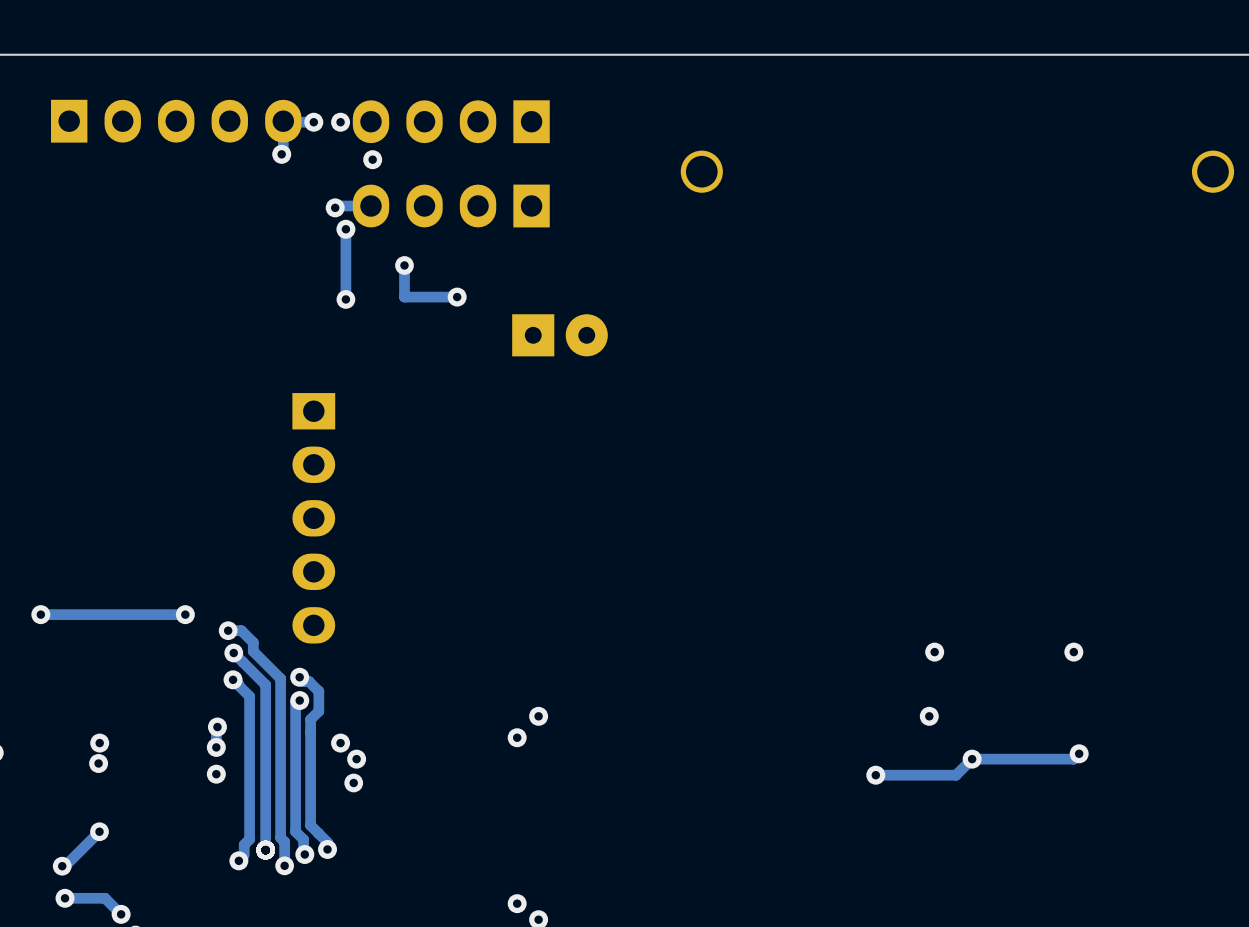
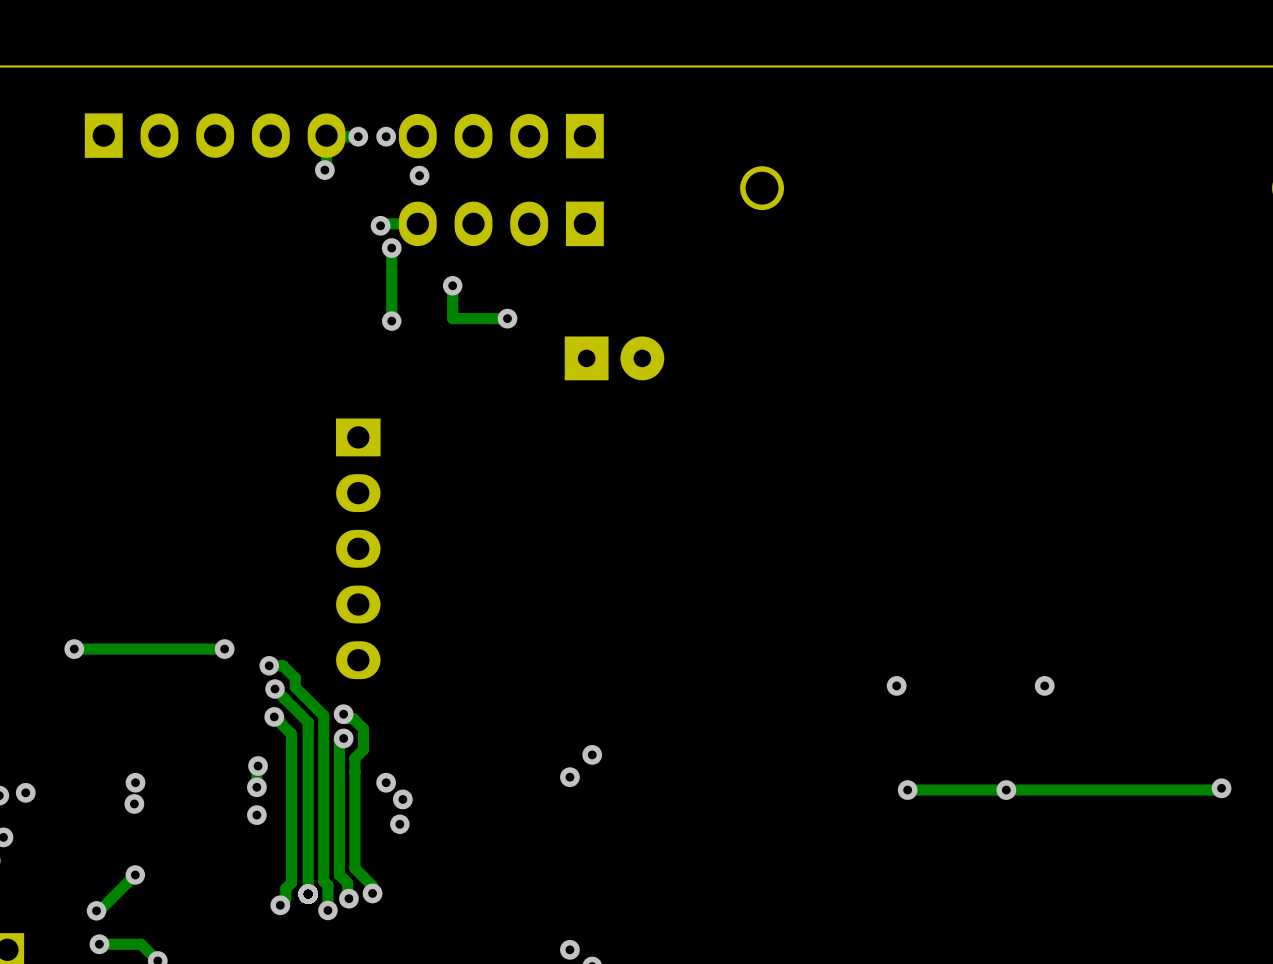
via: none -> (896, 685)
via position: (934, 652) -> (1044, 685)
via: (1073, 652) -> none
via: (929, 716) -> none
track: none -> (1221, 788) (1219, 790) (907, 790)
via: none -> (1221, 788)
via: none -> (907, 790)
via: none -> (1006, 790)
track: (1079, 753) (1073, 759) (972, 759) (956, 775) (875, 775) -> none
via: (1079, 753) -> none
via: (972, 759) -> none
via: (875, 775) -> none

